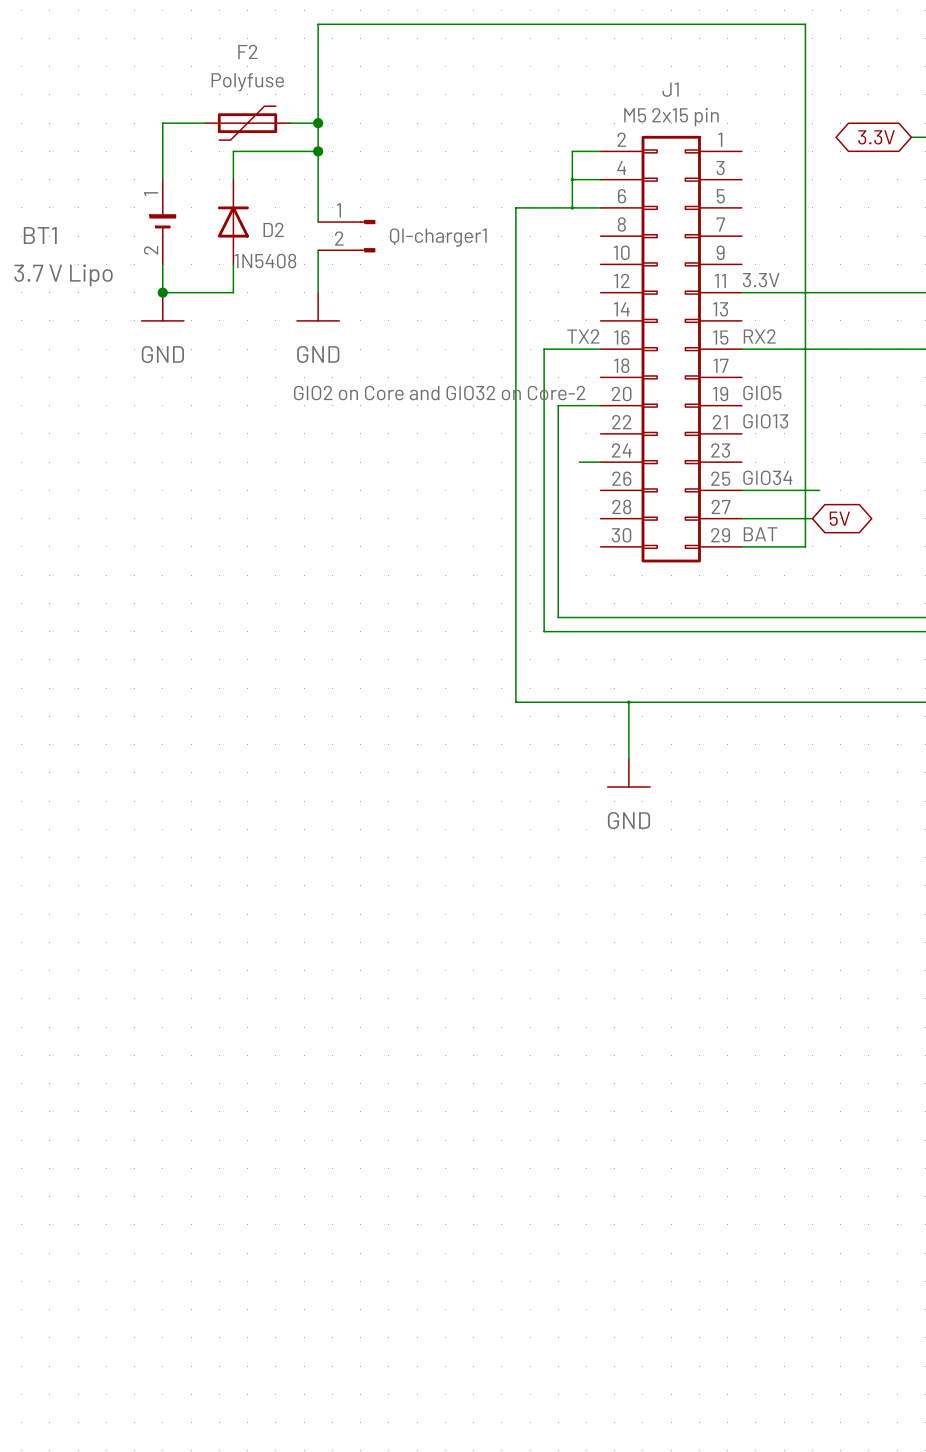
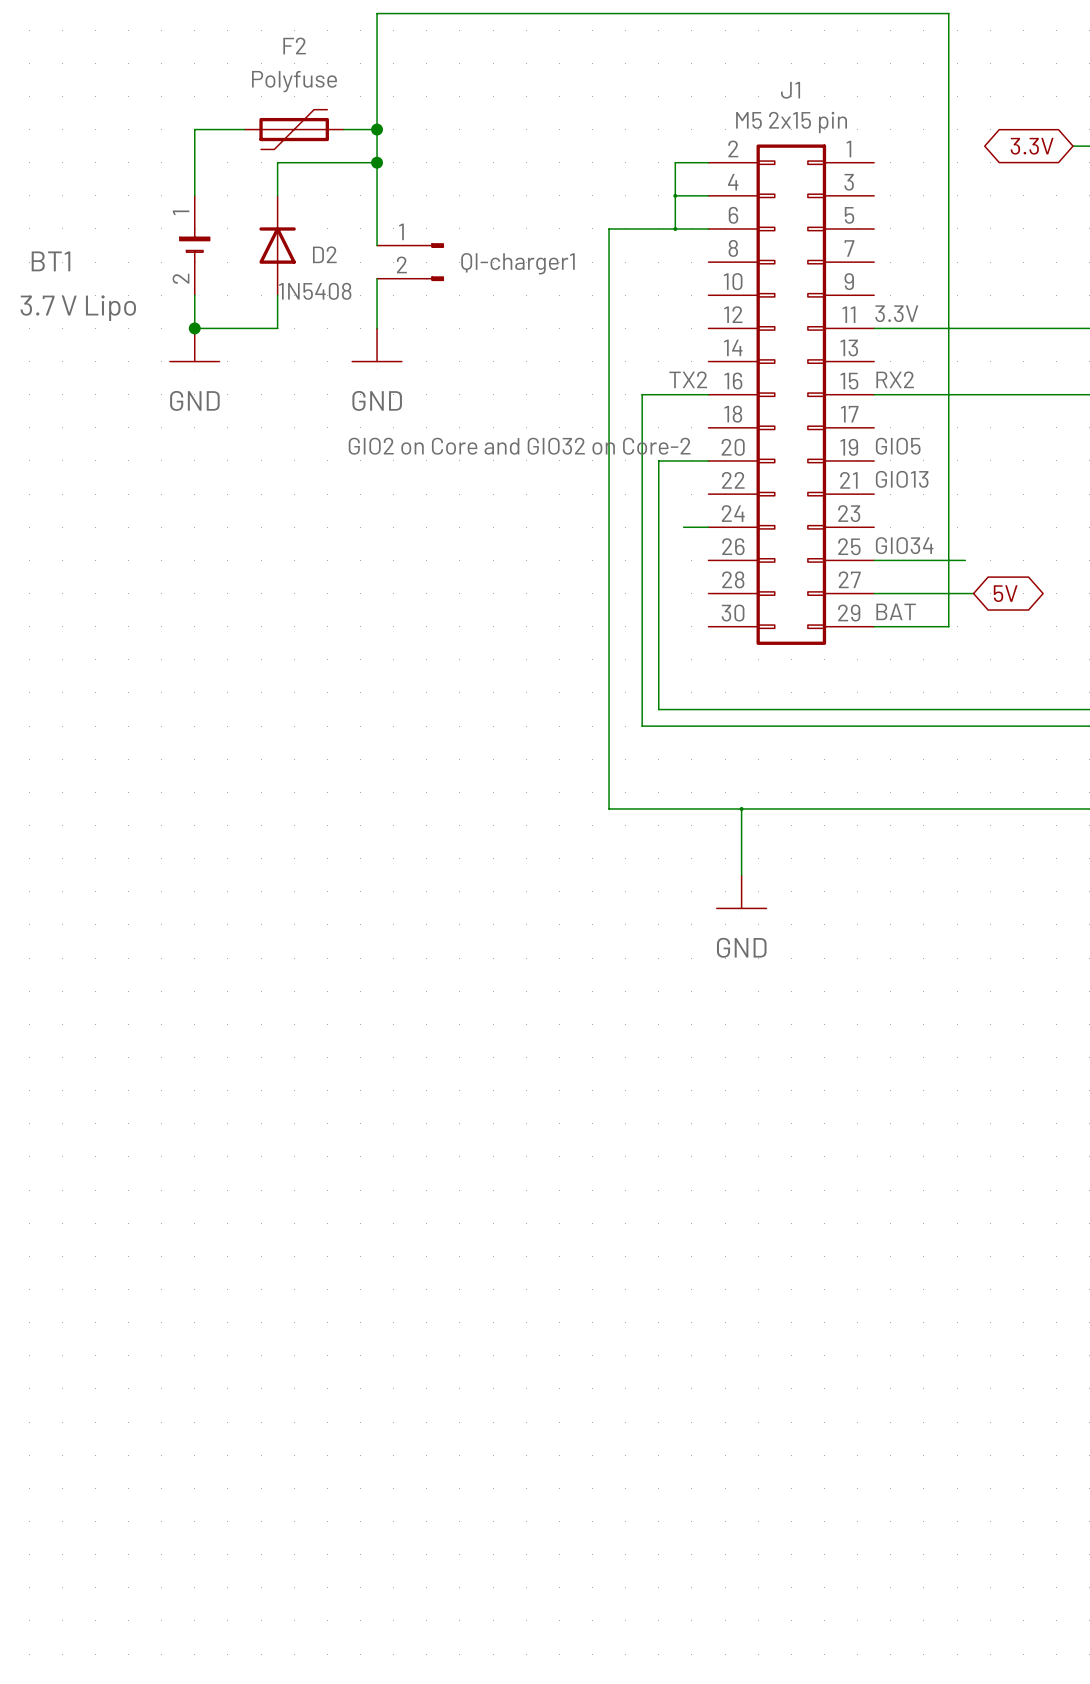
wire: none -> (957, 593) (973, 593)
global label position: 5V (839, 518) -> 5V (1005, 593)

